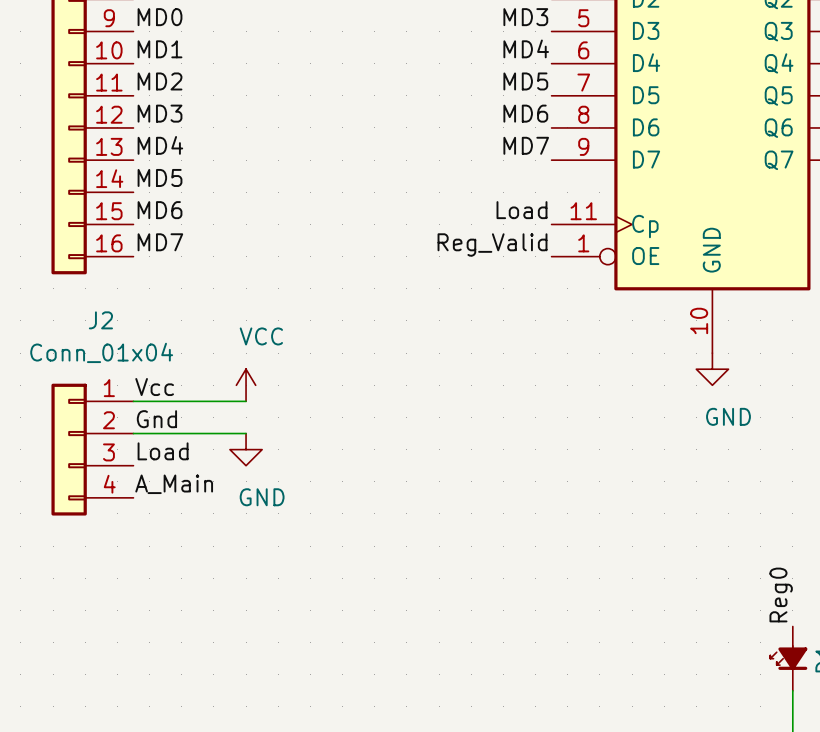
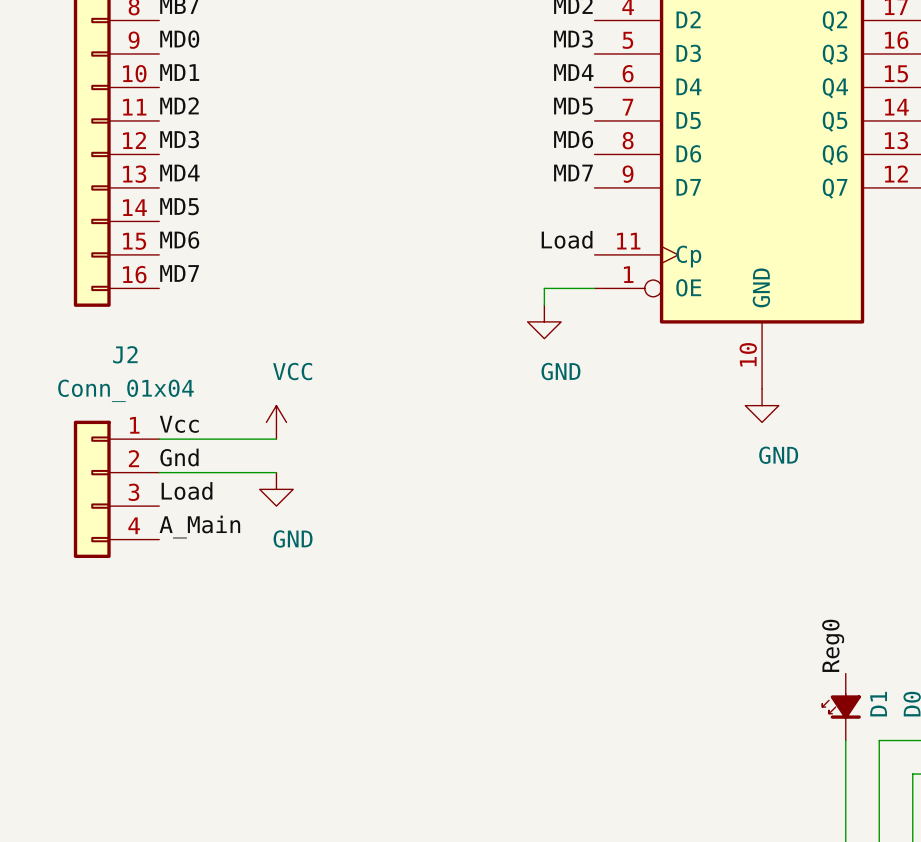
label: Reg_Valid (492, 244) -> none
wire: none -> (594, 288) (544, 288) (544, 305)
power symbol: none -> GND (544, 321)

